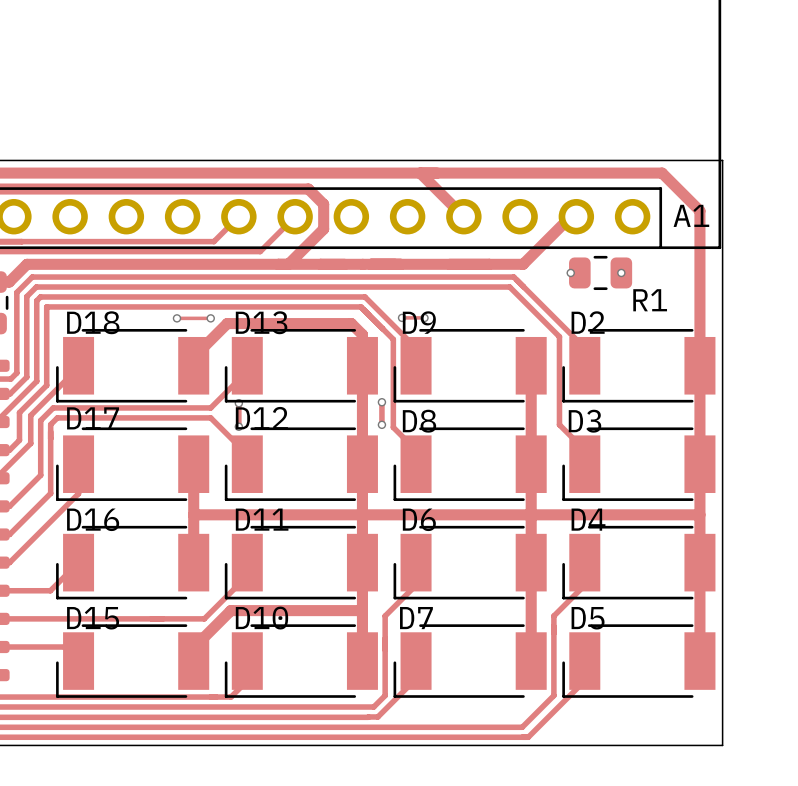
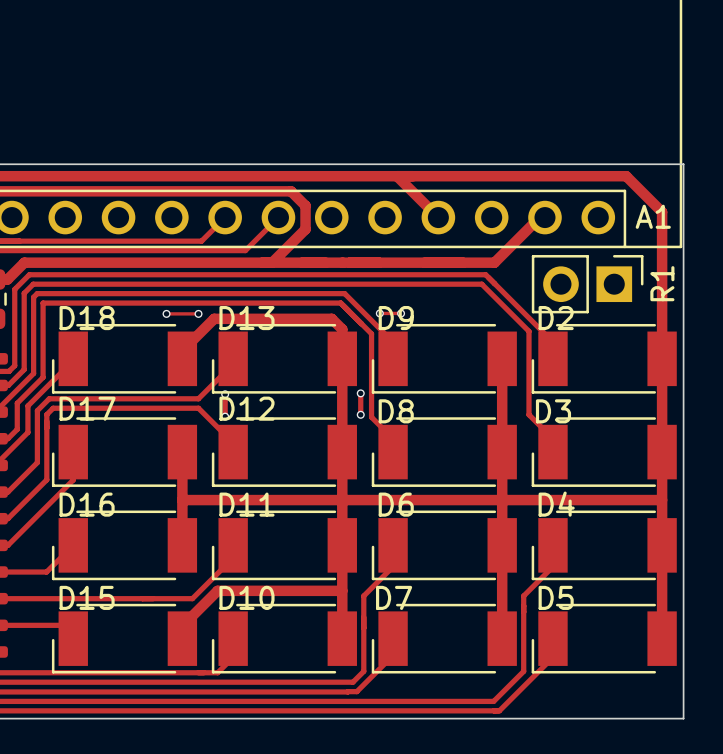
R1 footprint: [569, 255, 633, 291] -> [531, 255, 644, 314]
via: (570, 272) -> none
via: (621, 272) -> none

